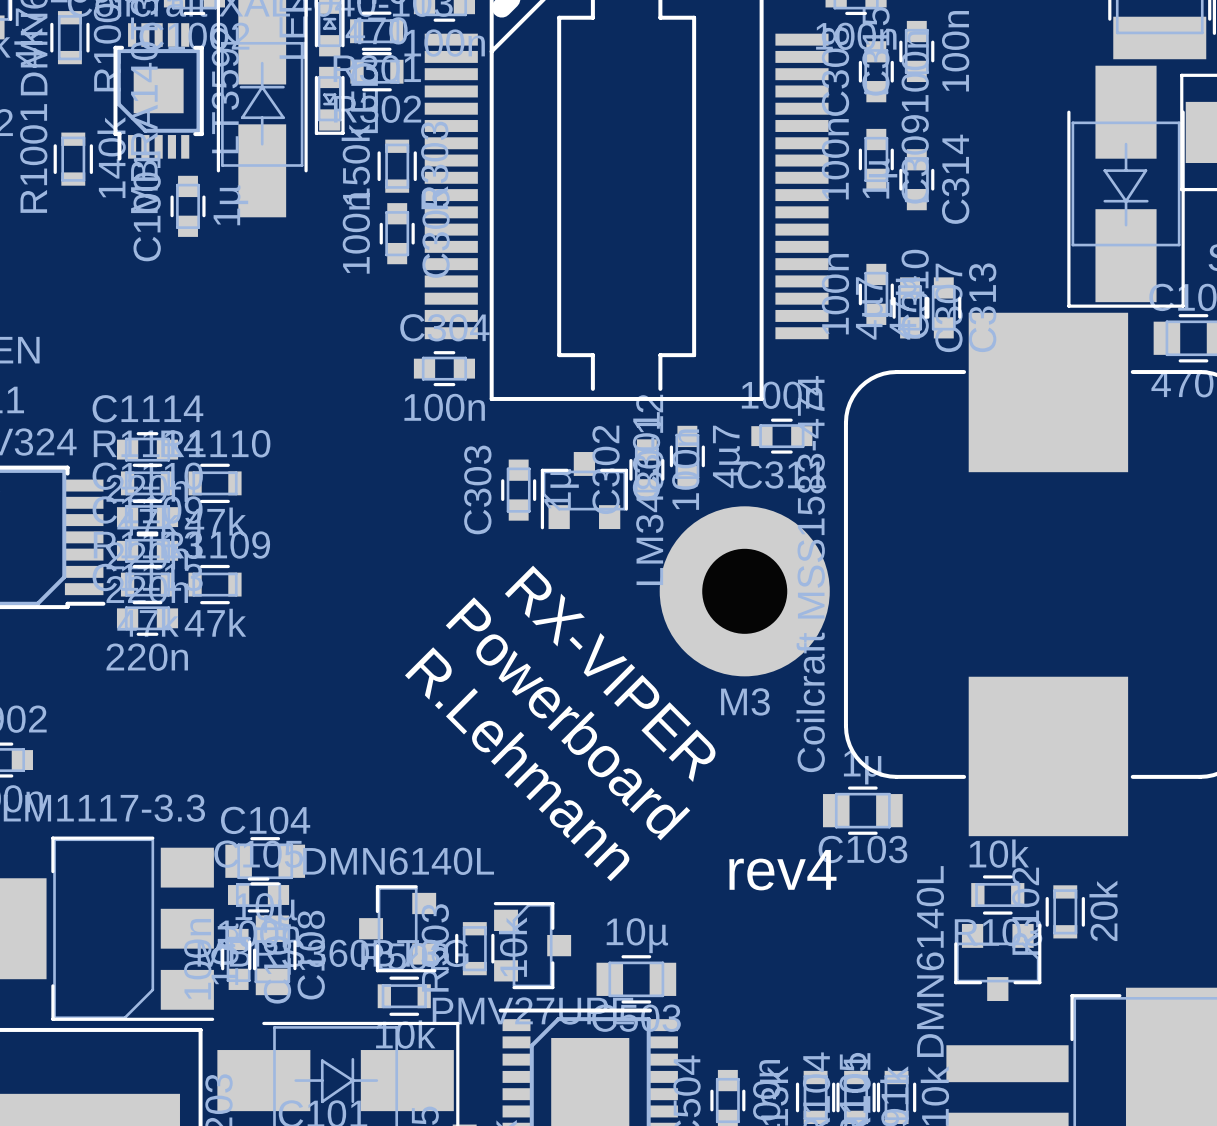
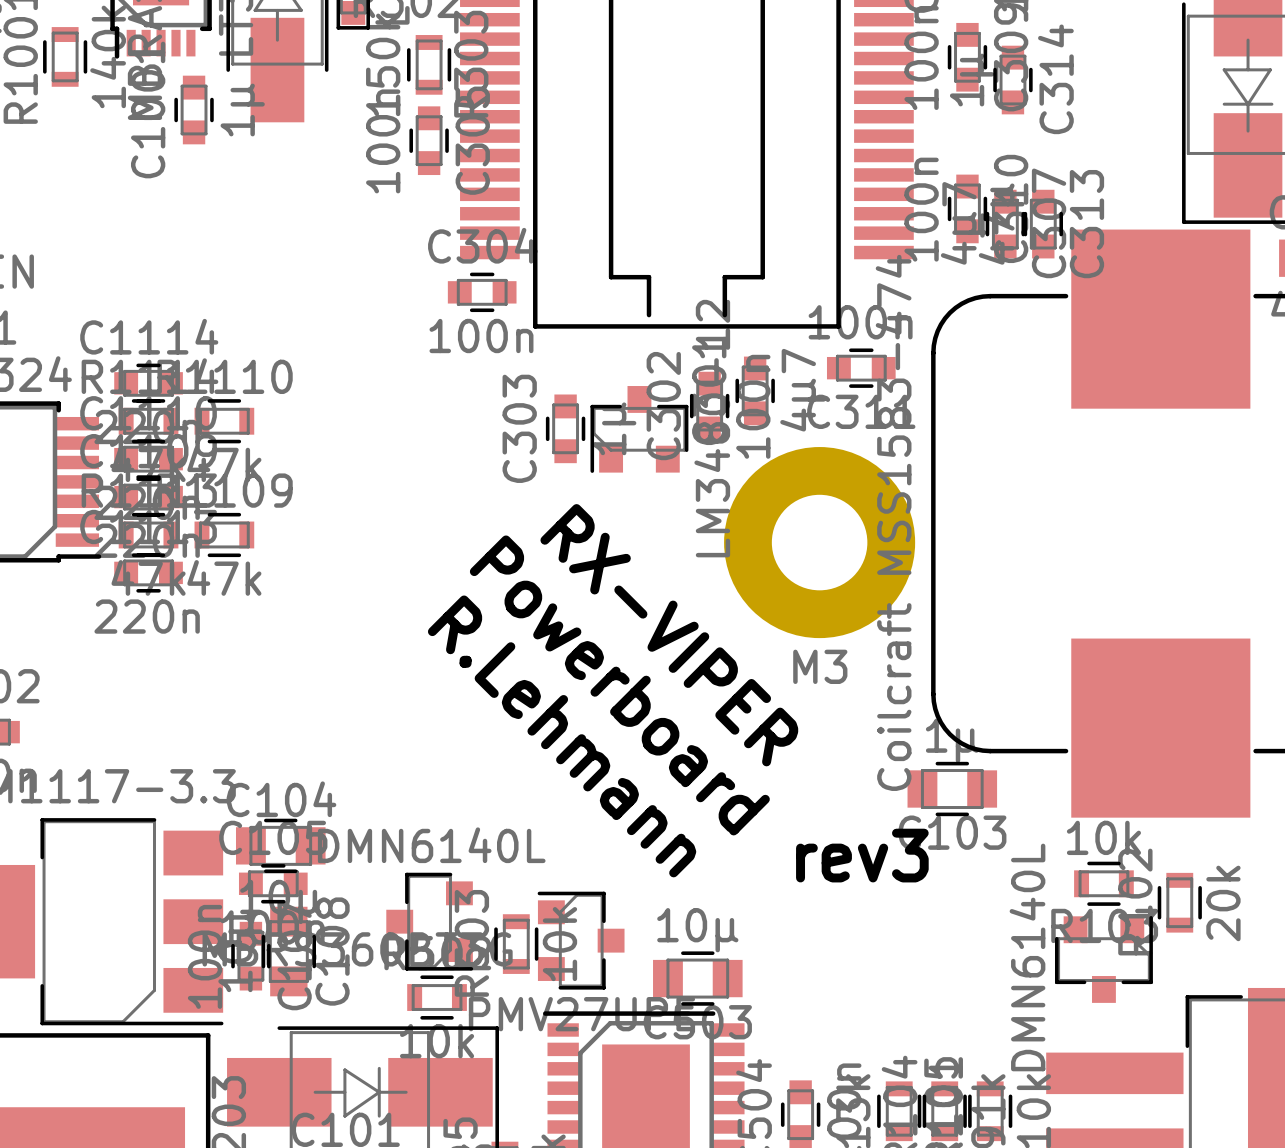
text: rev4 (782, 870) -> rev3 (862, 855)

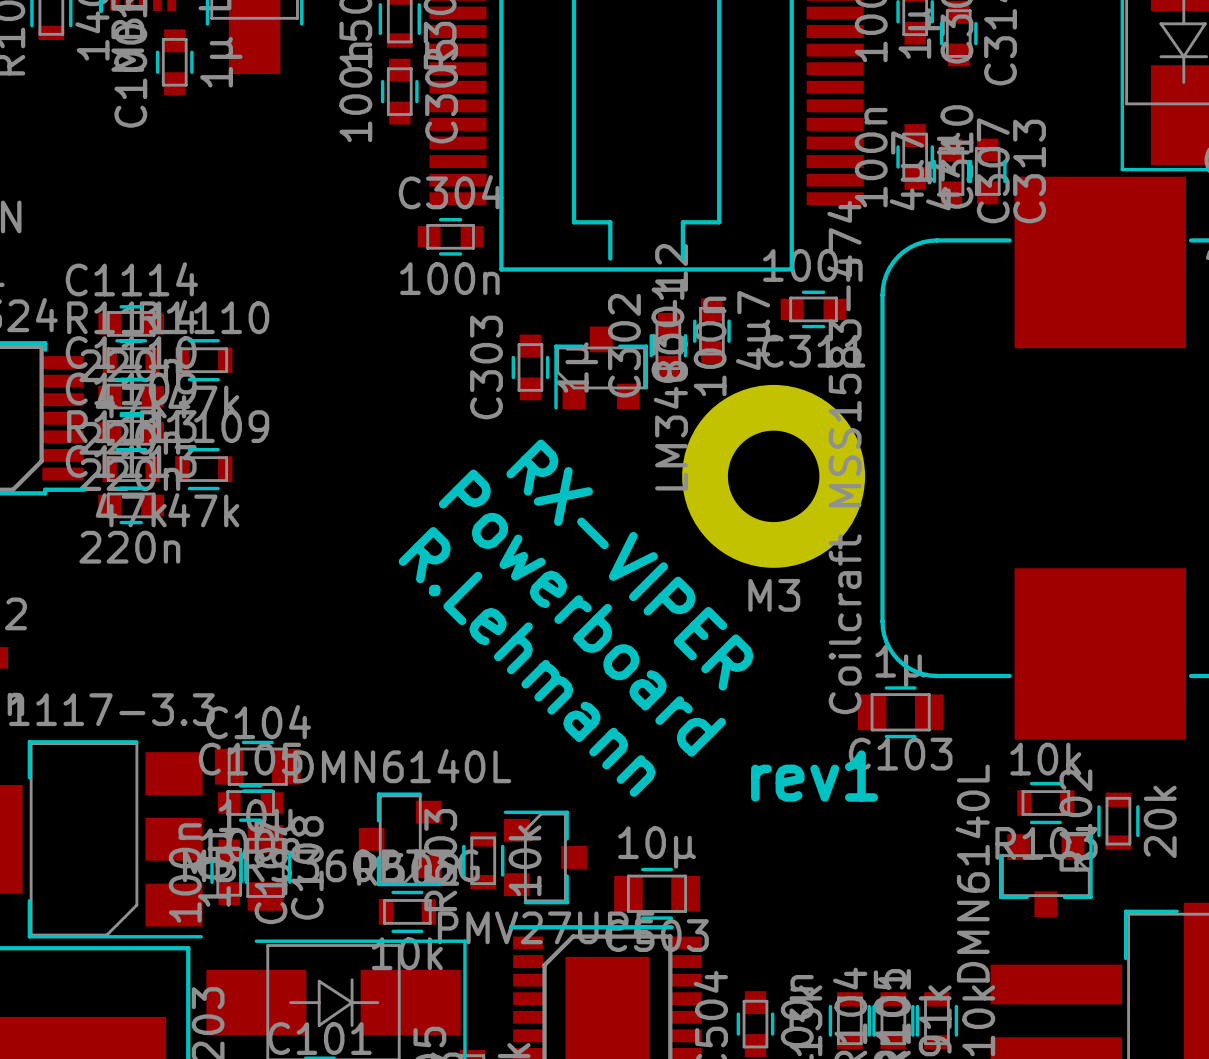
text: rev3 (862, 855) -> rev1 (814, 776)

